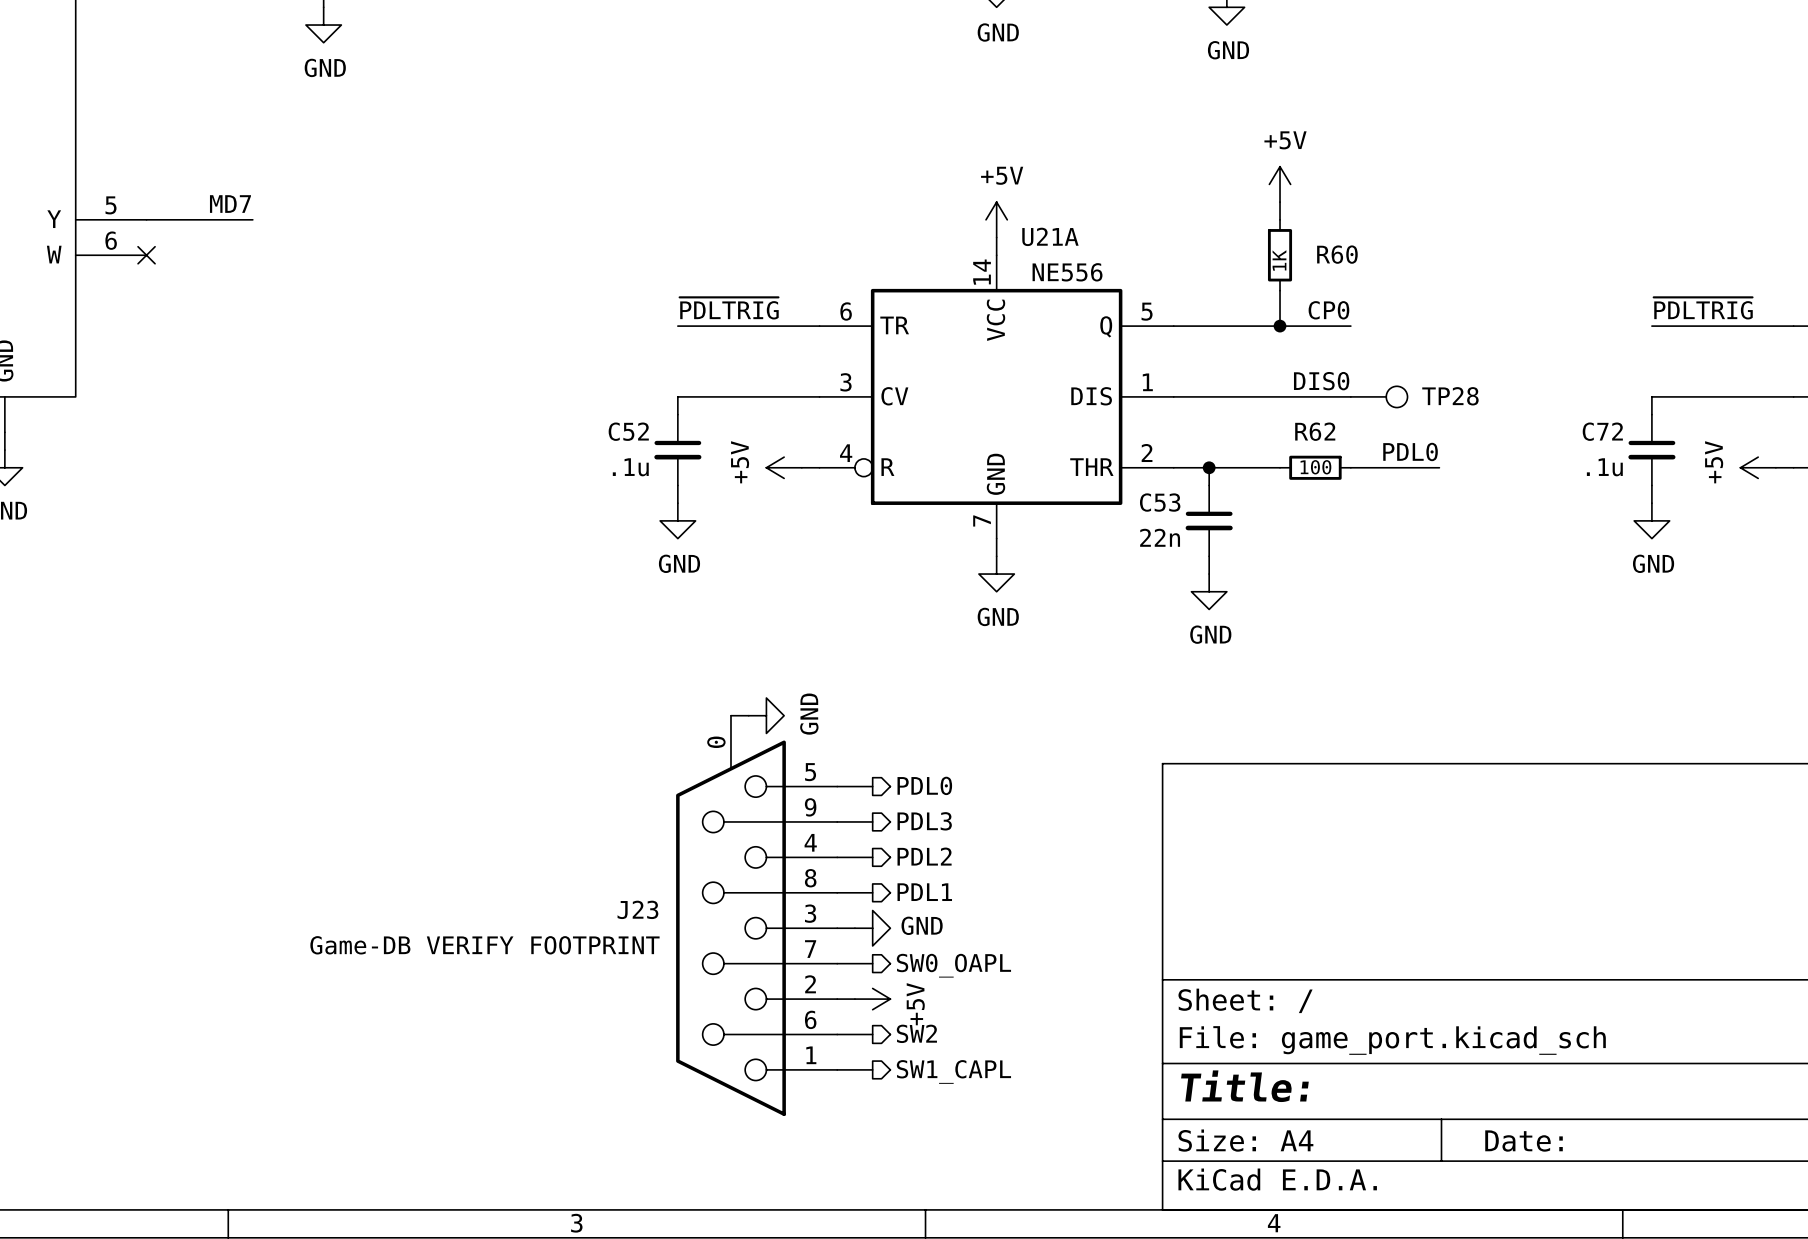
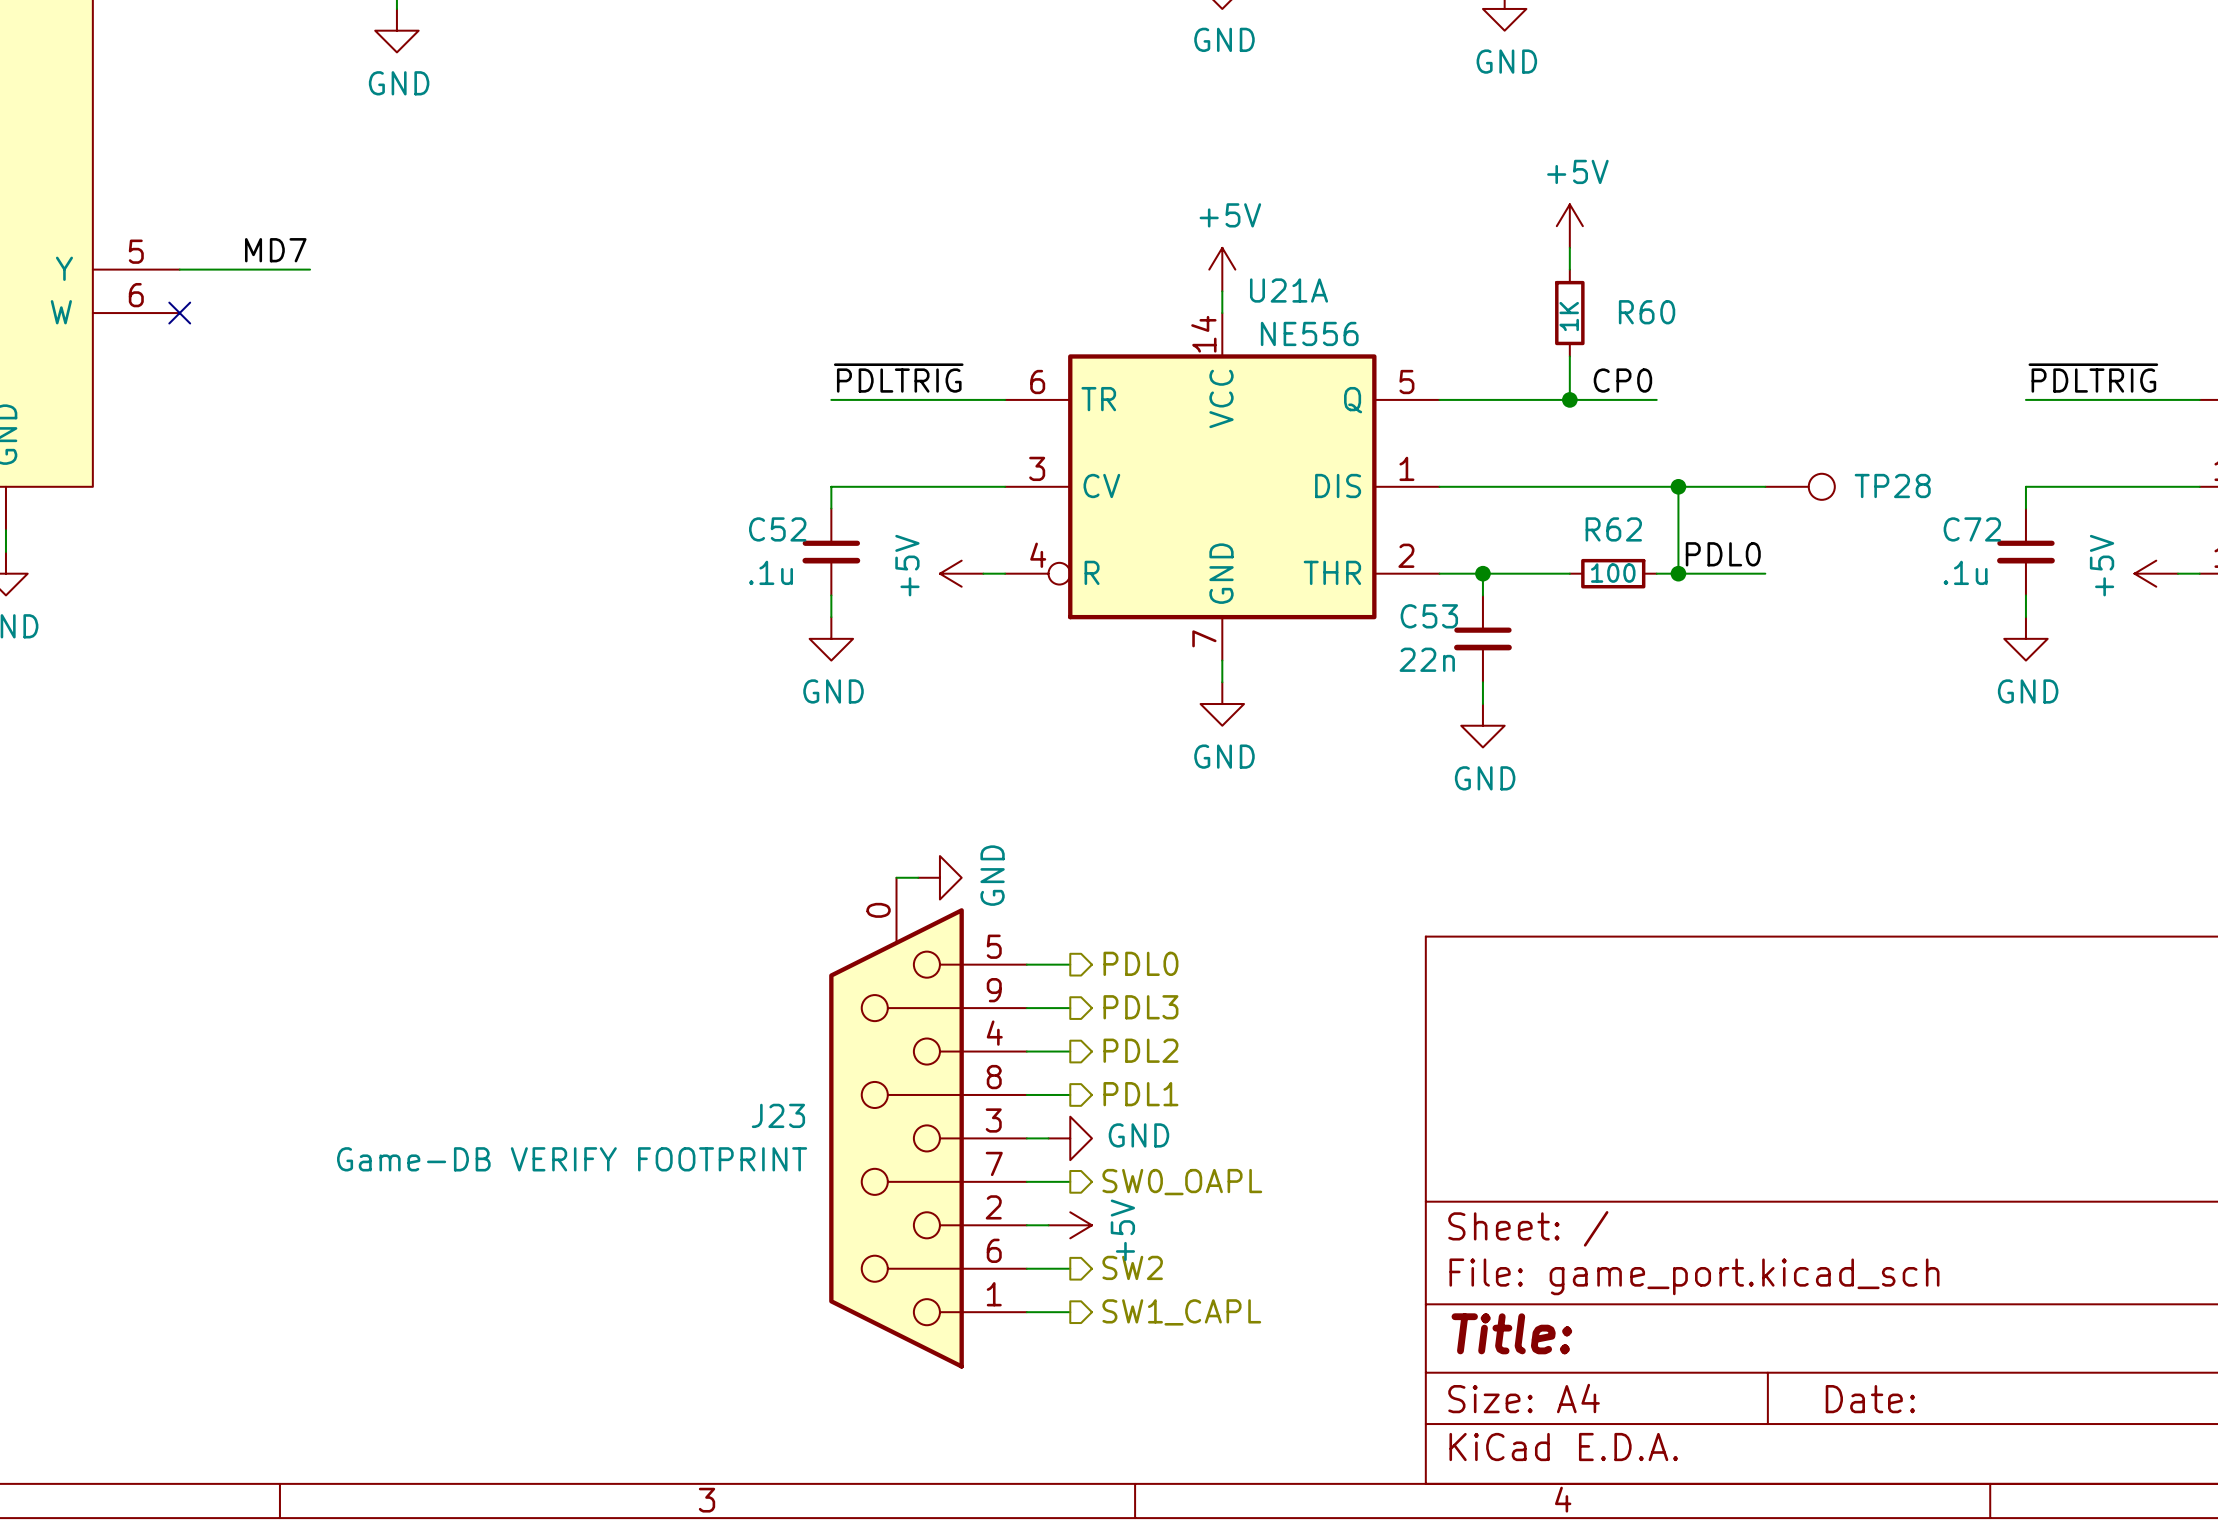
label: DIS0 (1321, 381) -> none
wire: none -> (1656, 486) (1765, 486)
wire: none -> (1678, 486) (1678, 573)
junction: none -> (1678, 486)
TP28 position: (1379, 396) -> (1800, 486)
junction: none -> (1678, 573)

